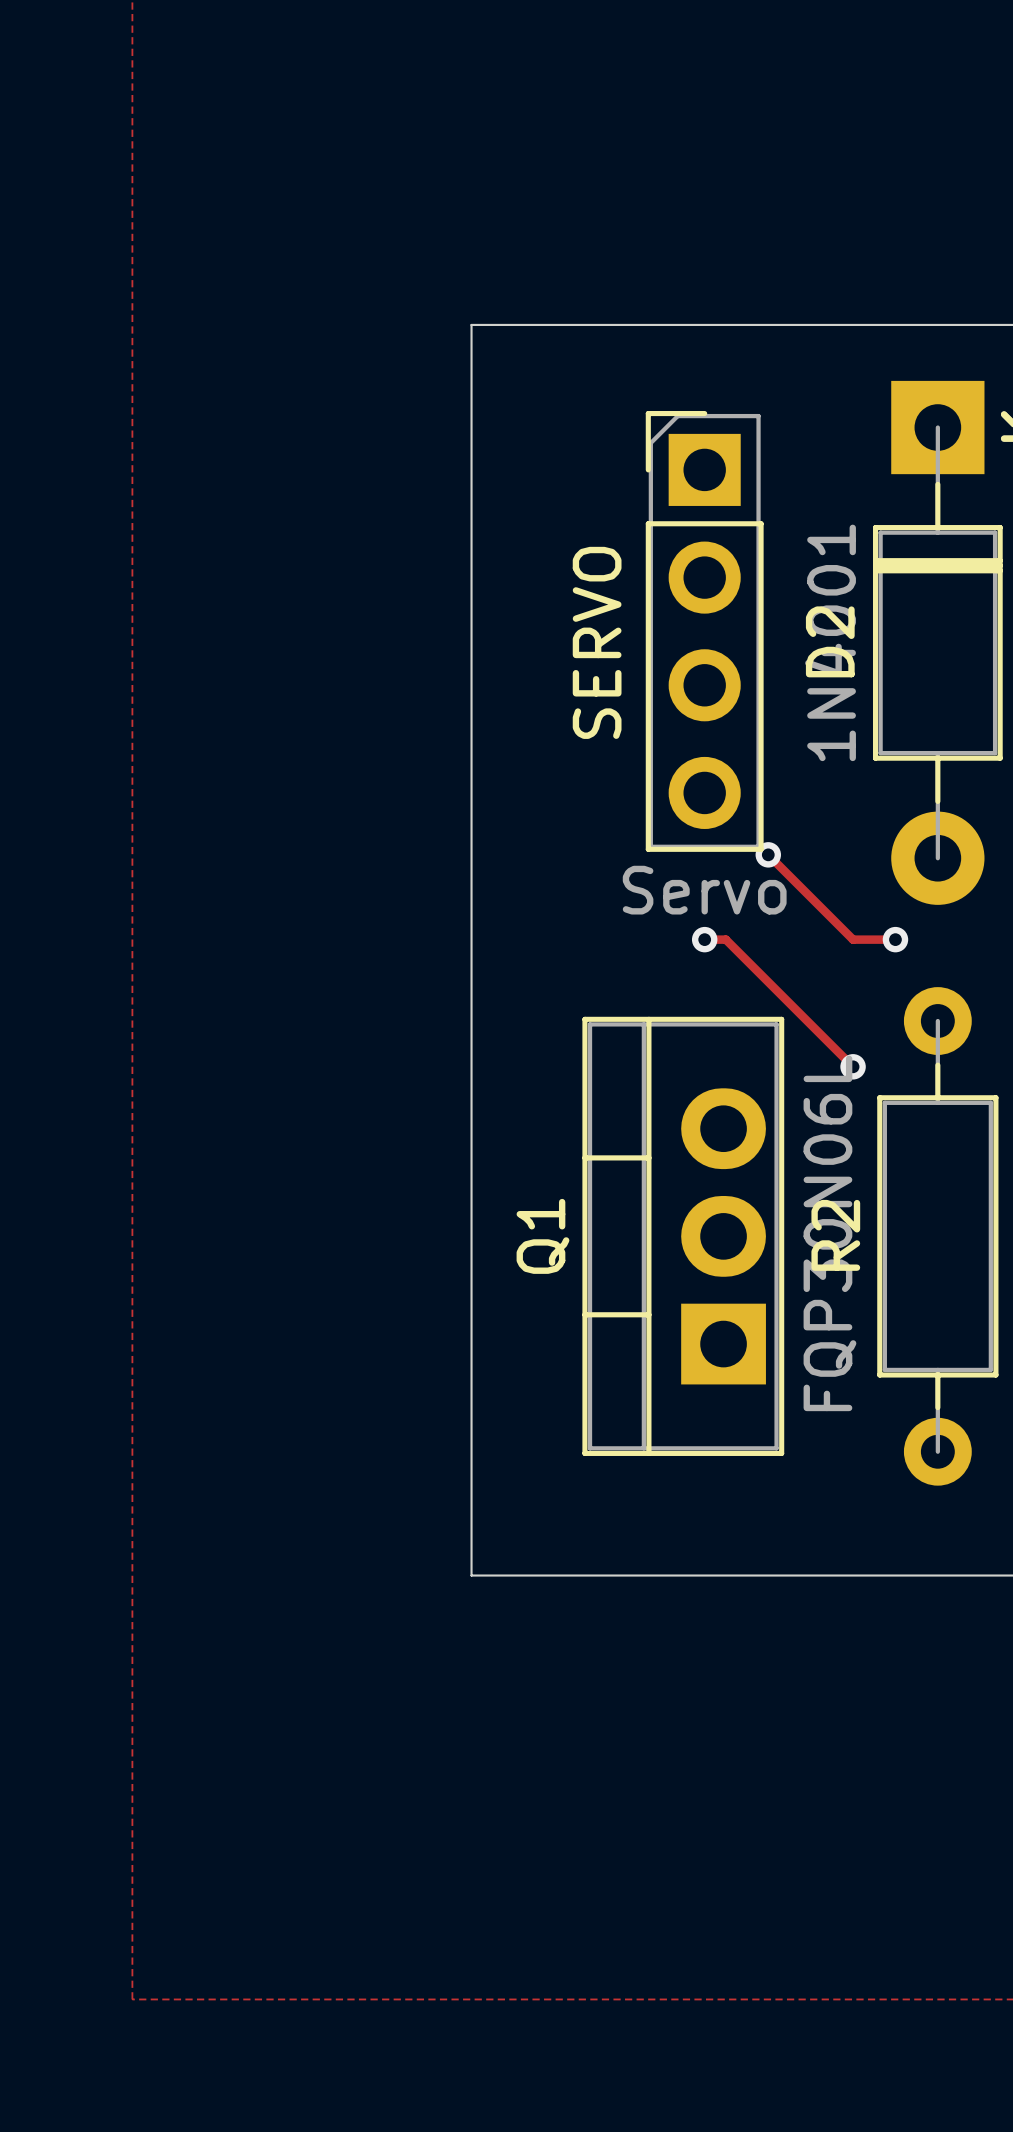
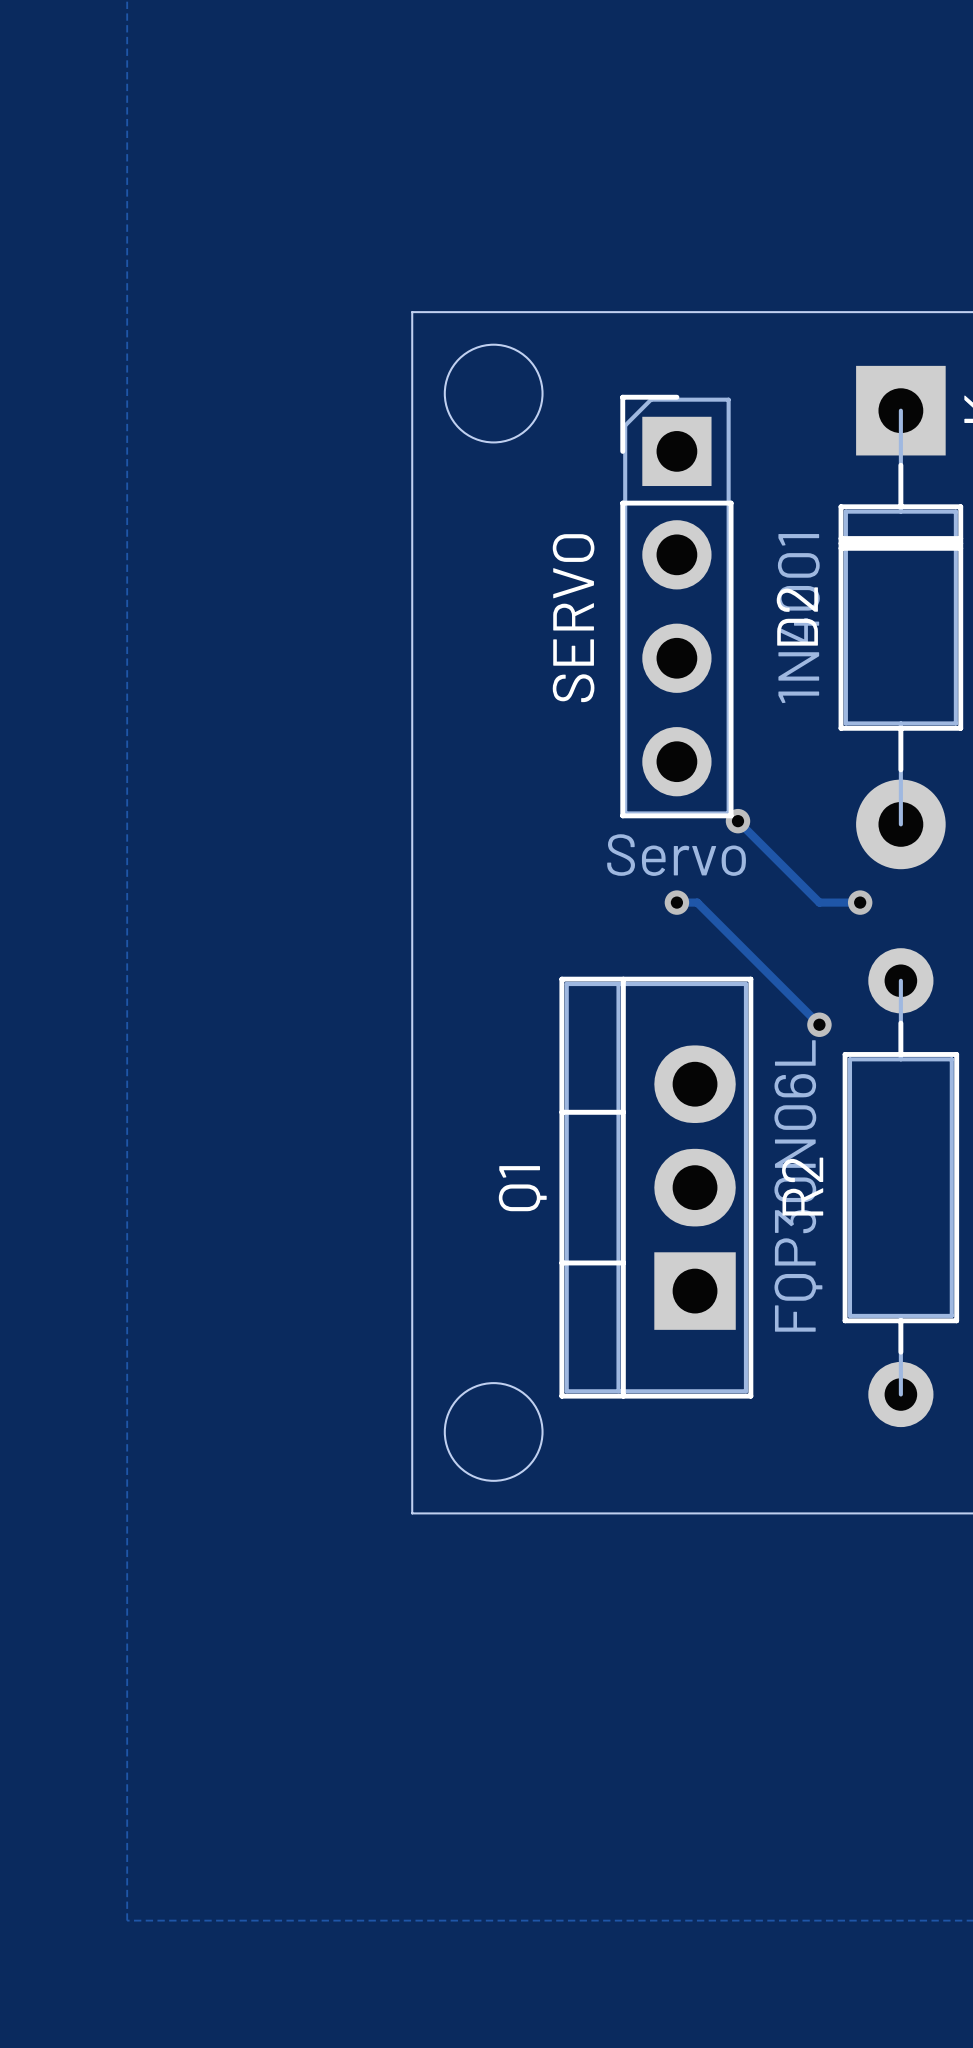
board edge: (471, 324) (471, 1575) -> (452, 312) (412, 312) (412, 1513) (452, 1513)
round board edge: none -> [443, 343, 544, 444]
round board edge: none -> [443, 1382, 544, 1482]

